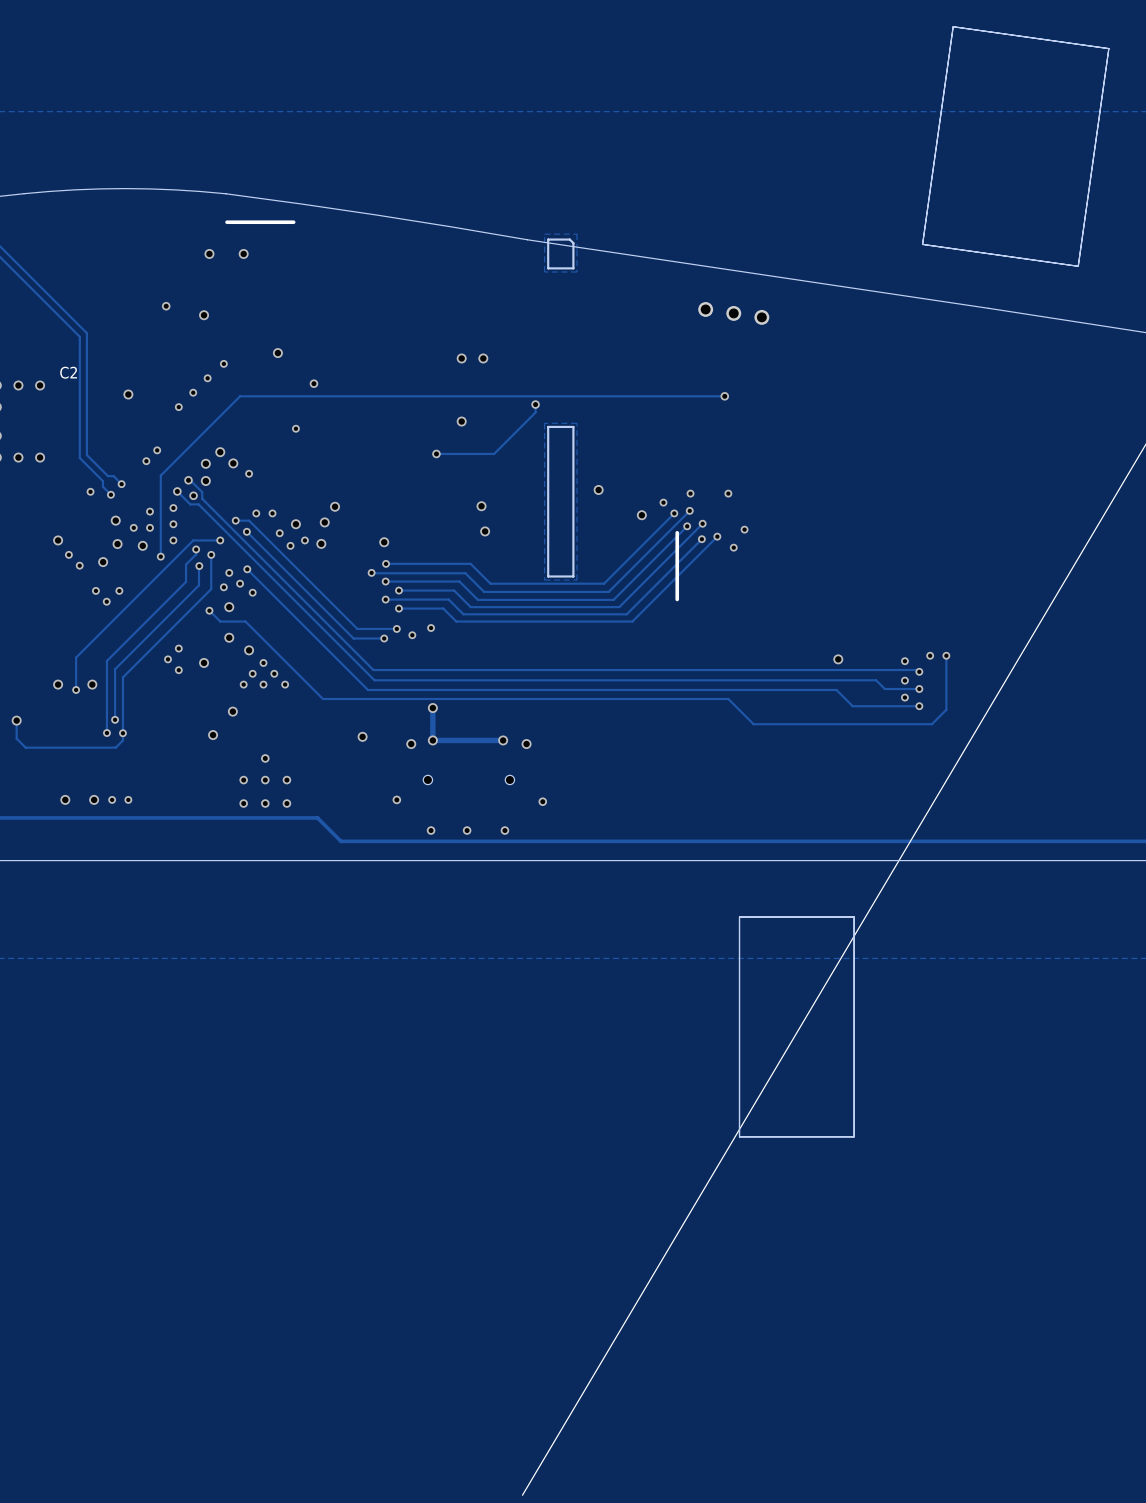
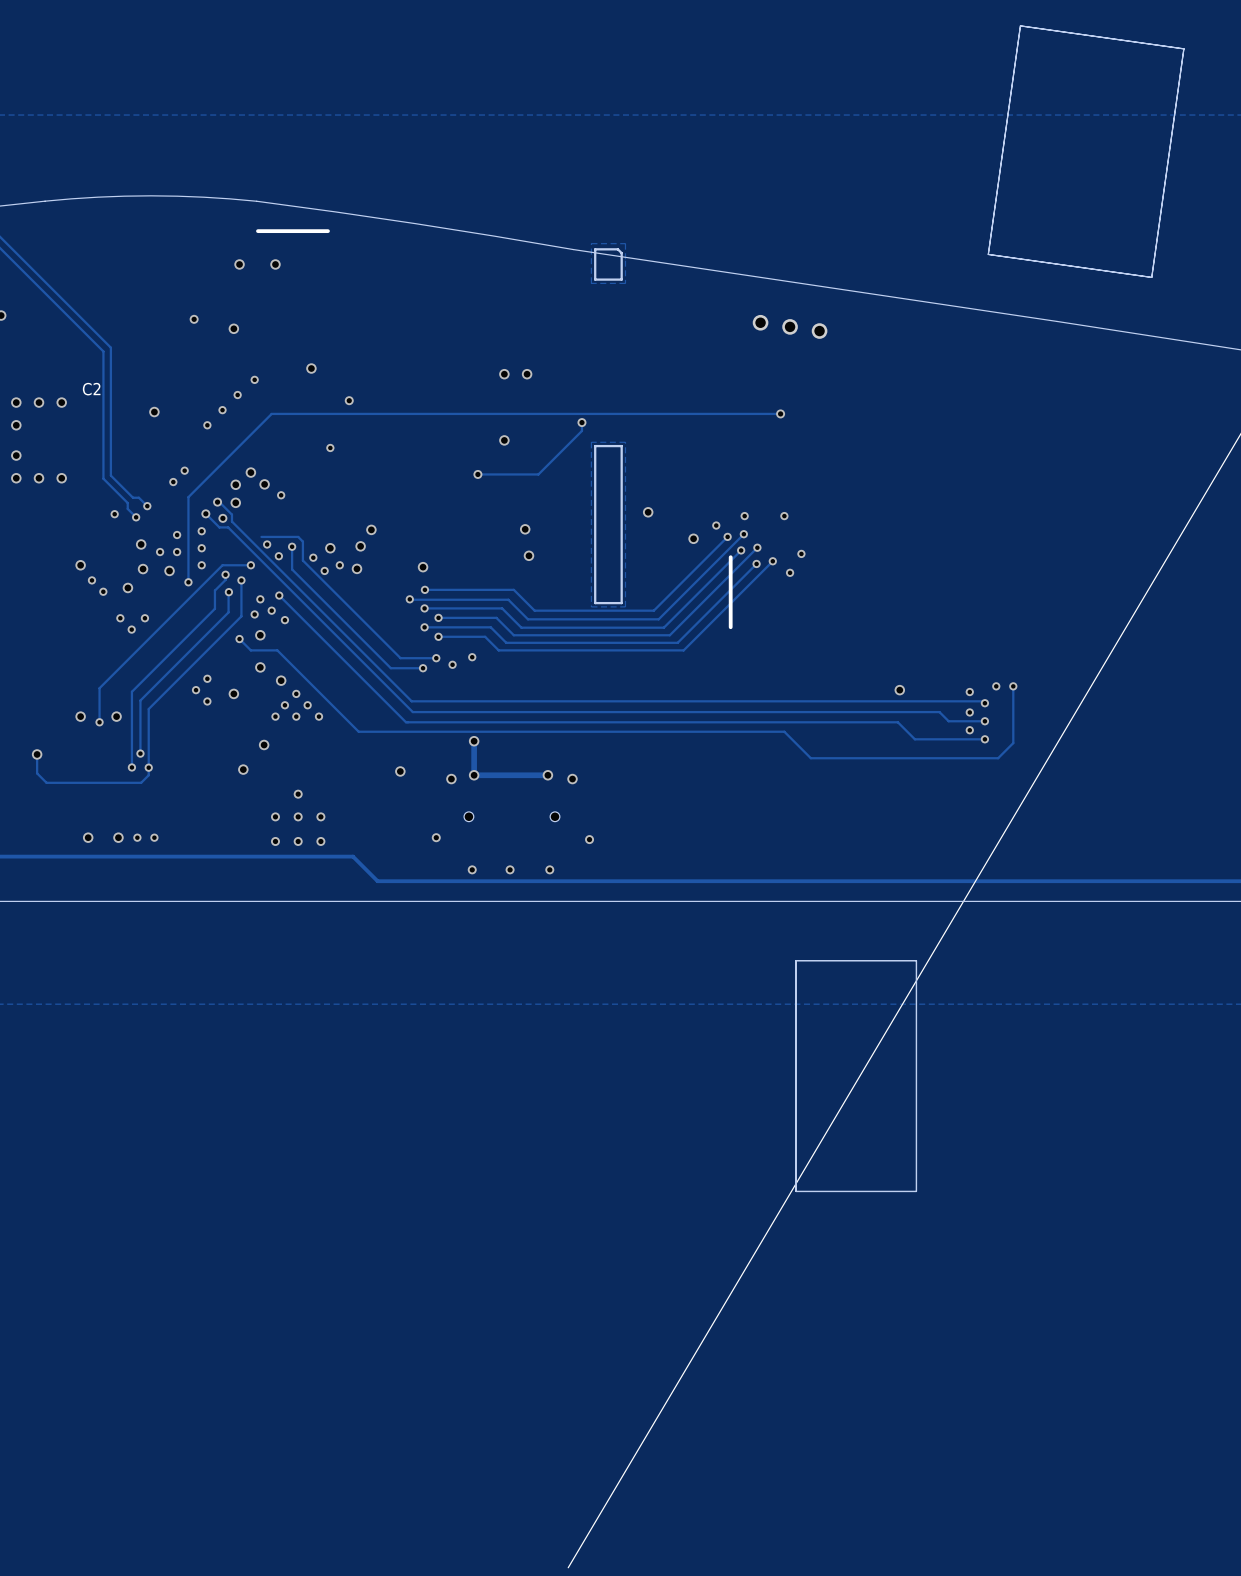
via: (256, 513) -> none
via: (272, 513) -> none
track: (235, 520) (249, 520) (357, 628) (362, 628) -> (261, 536) (298, 536) (302, 541) (302, 560) (400, 658)
via: none -> (292, 546)
track: (246, 531) (259, 544) -> (292, 546) (292, 569)

